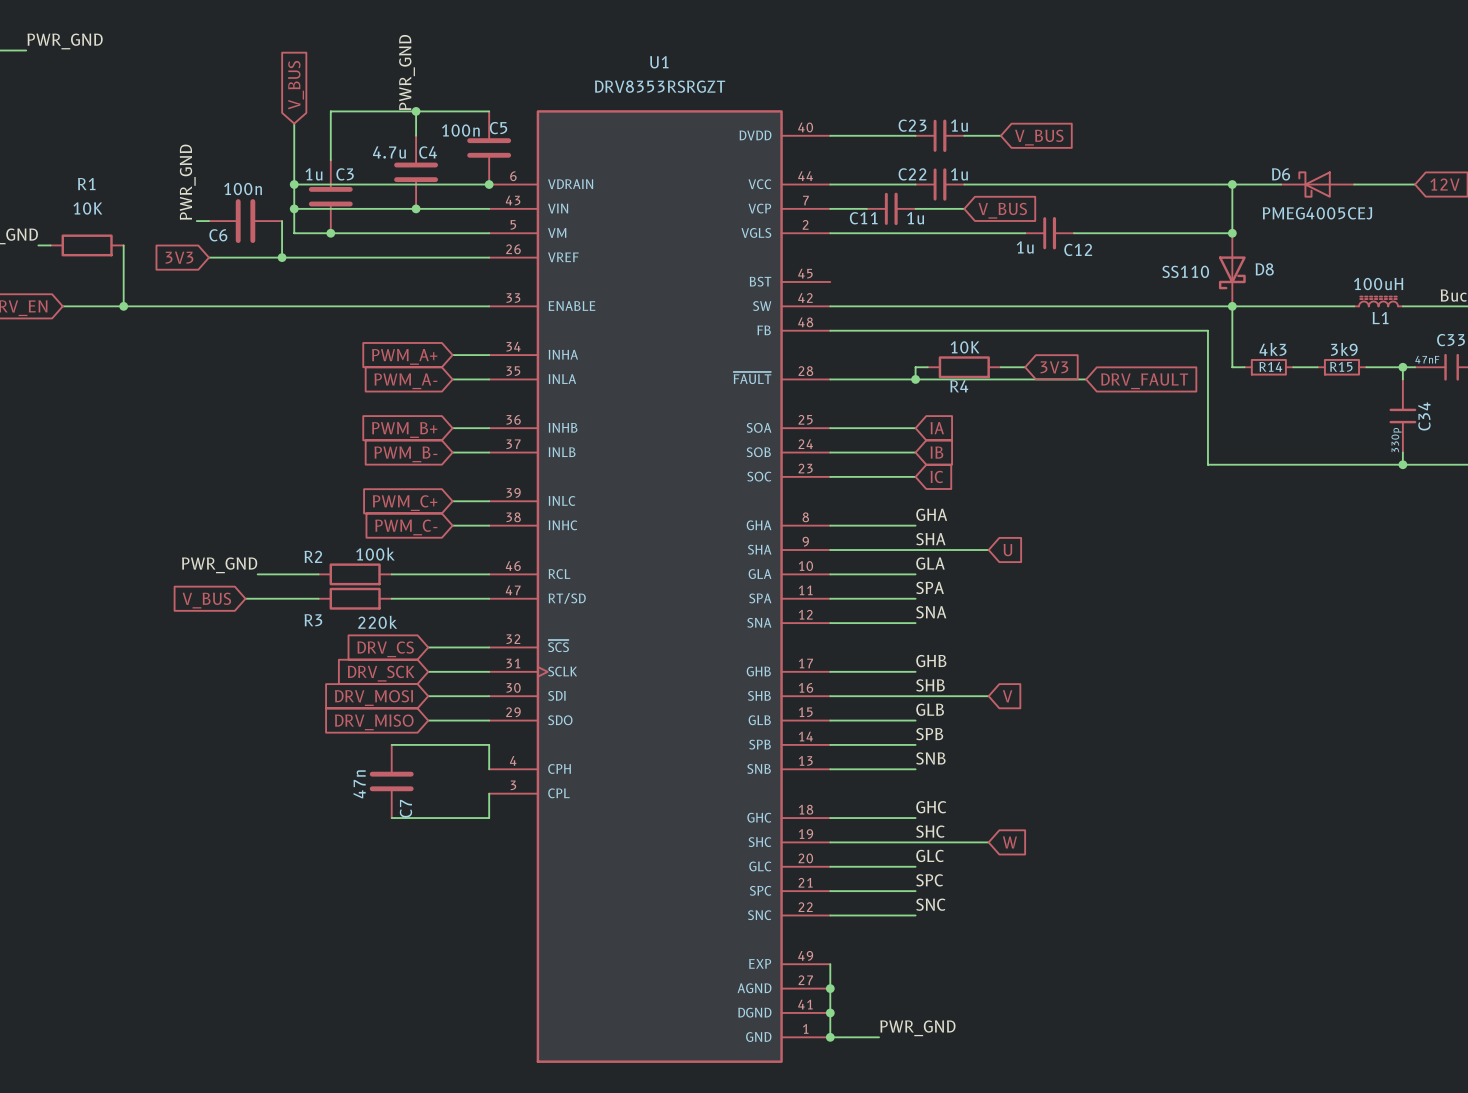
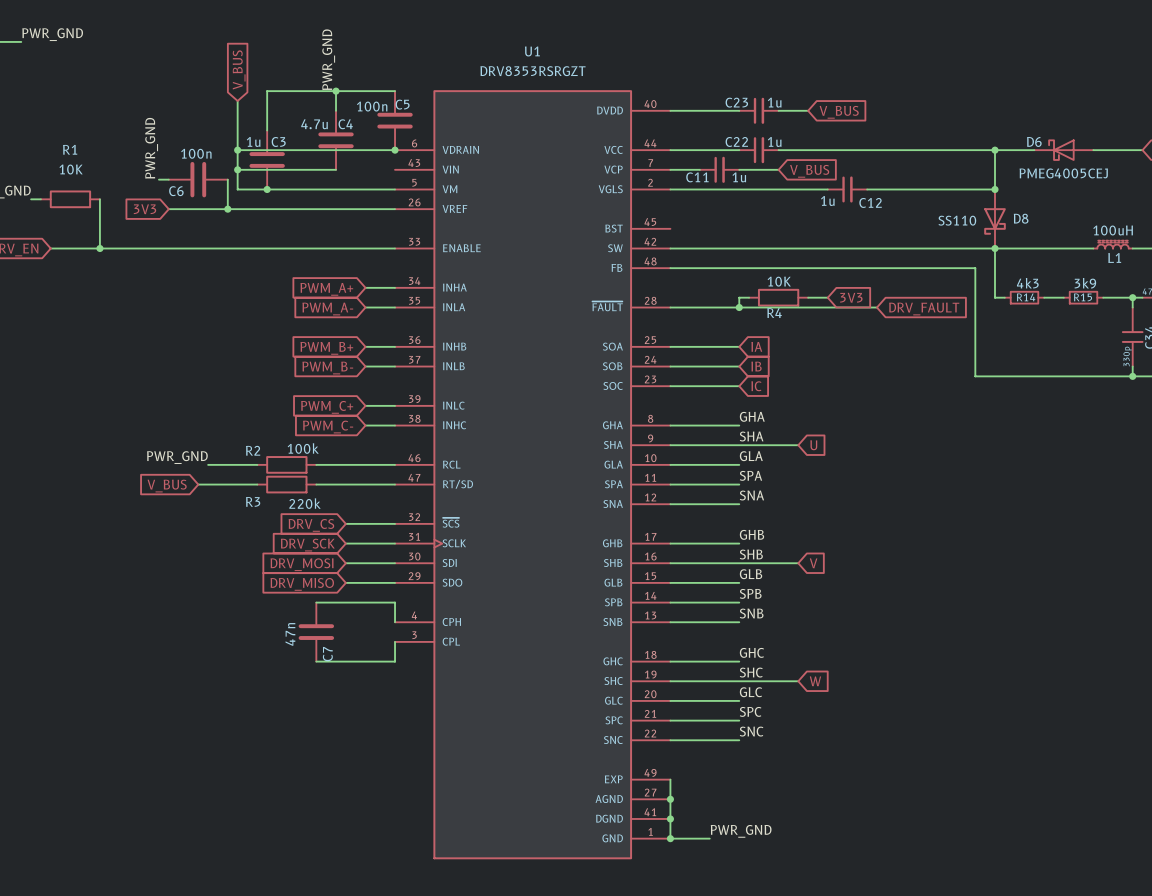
wire: (416, 208) (489, 208) -> none
junction: (416, 208) -> none

